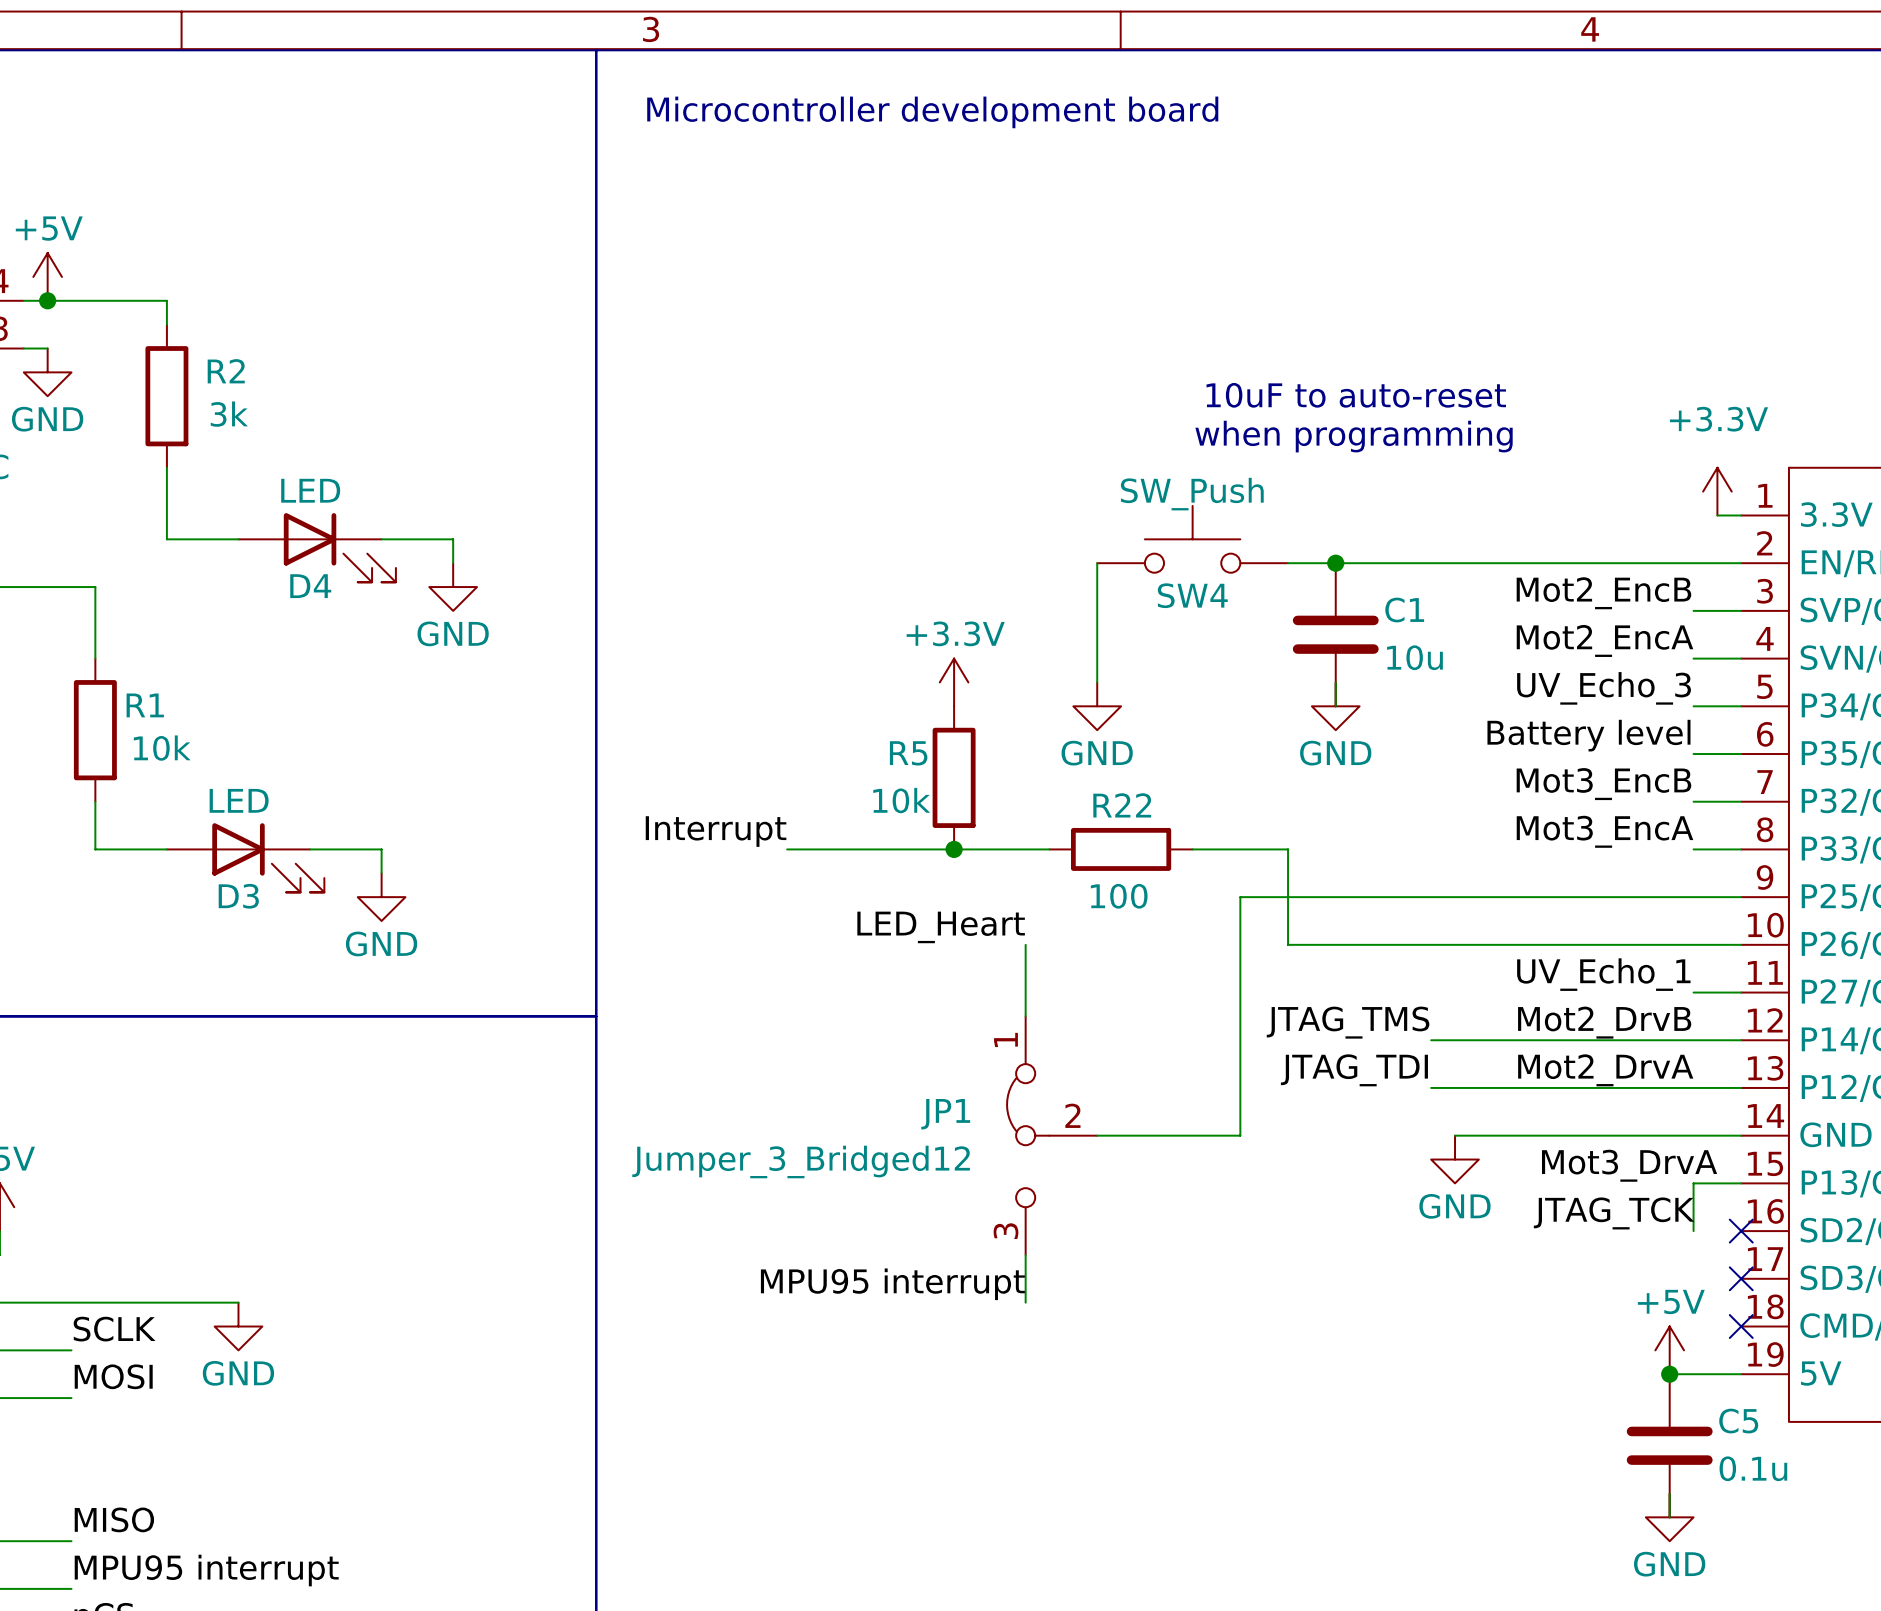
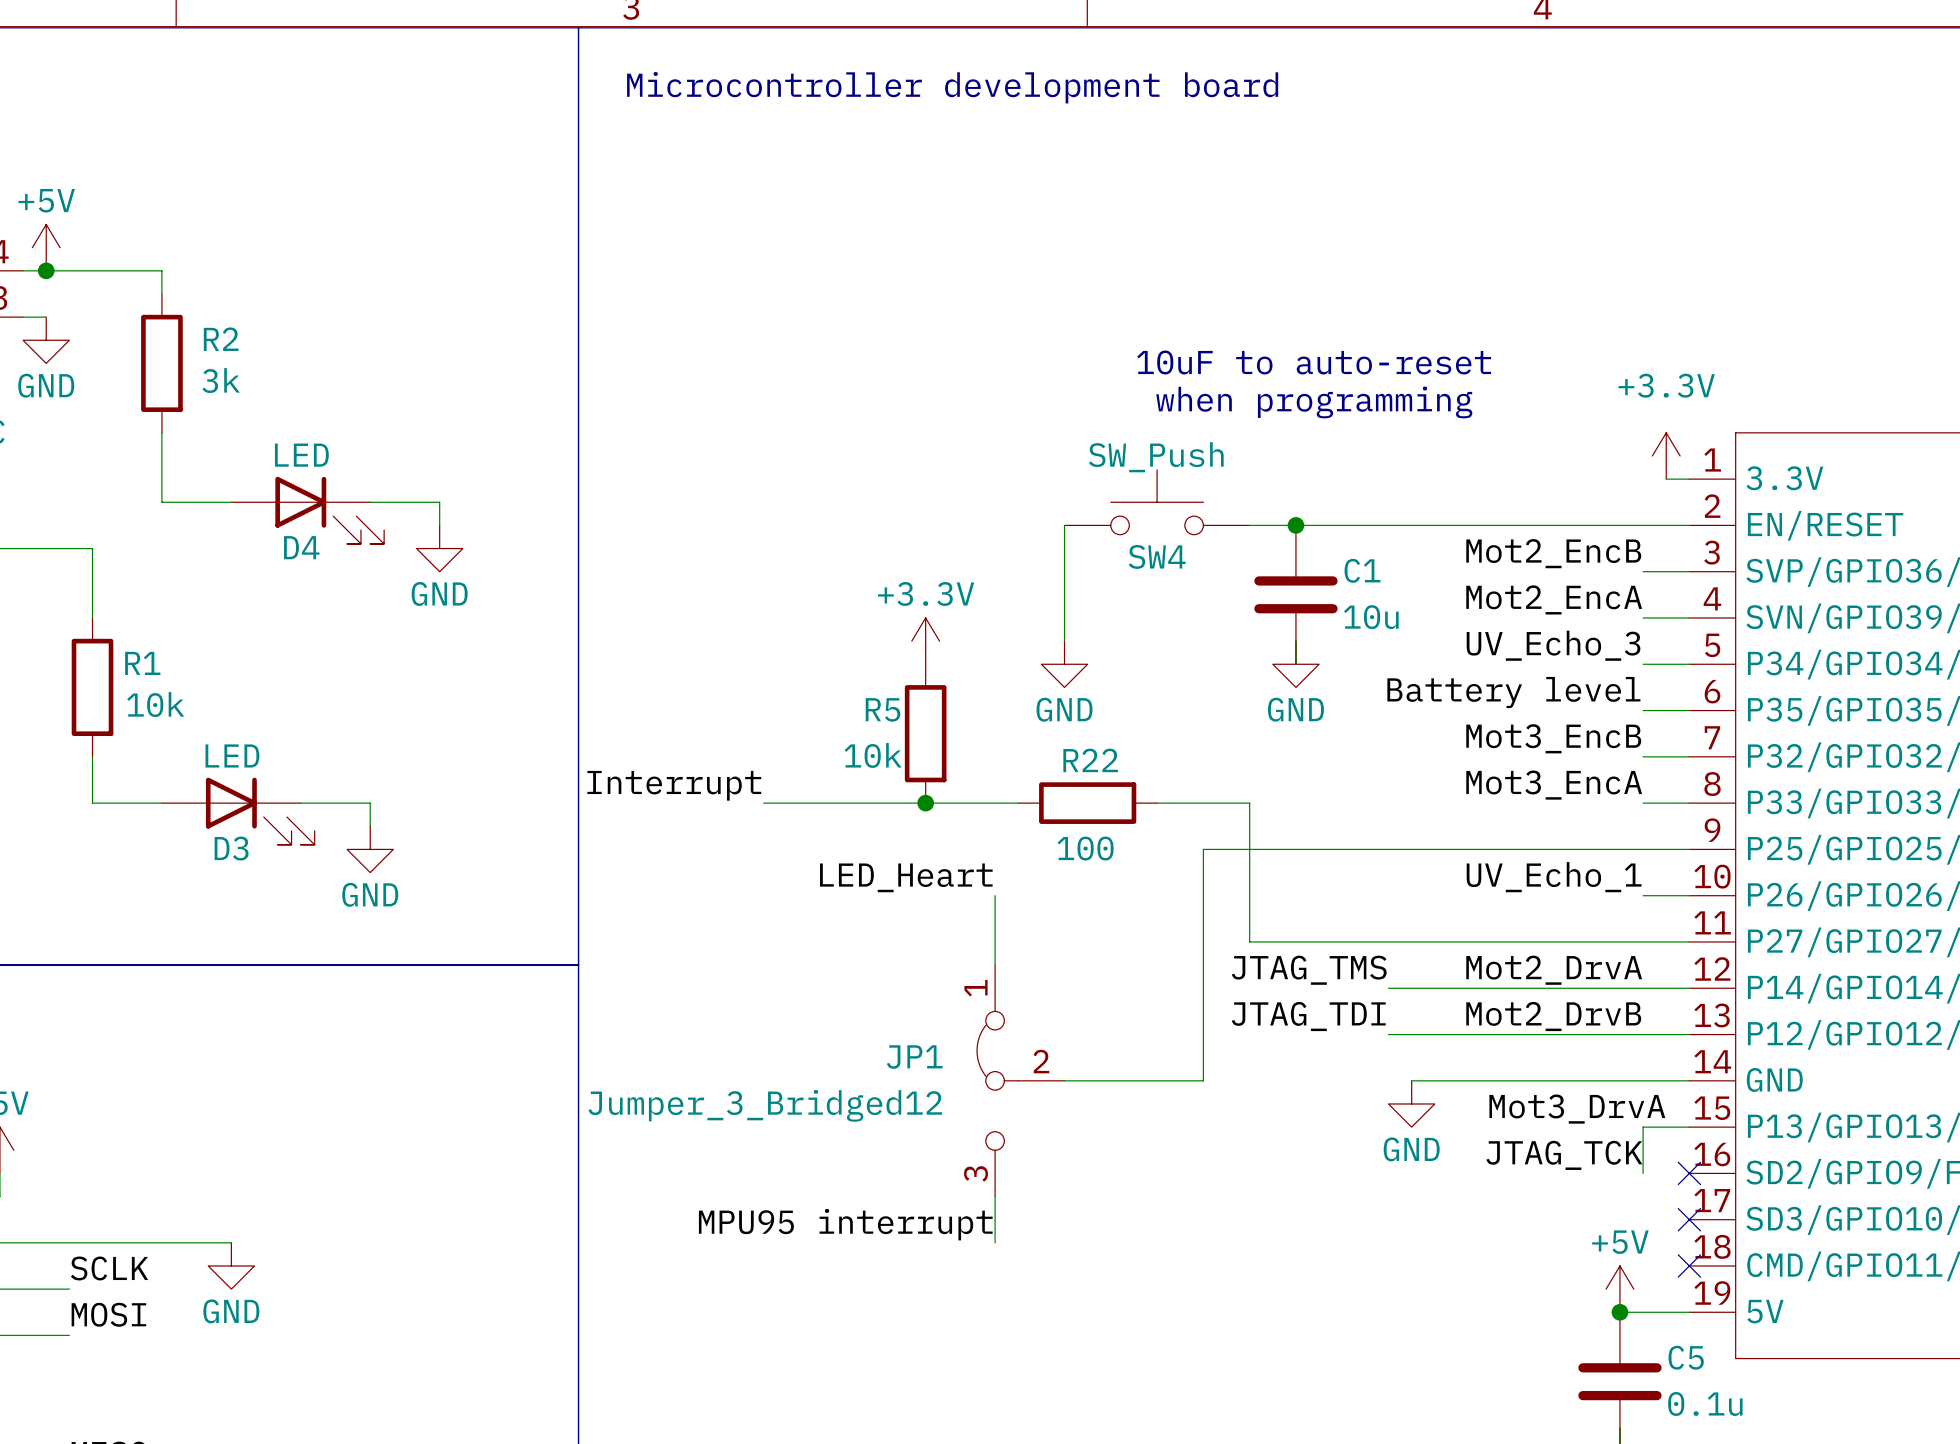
wire: (1288, 944) (1693, 944) -> (1249, 895) (1249, 941) (1643, 941)
label position: UV_Echo_1 (1603, 974) -> UV_Echo_1 (1554, 877)
label: Mot2_DrvB (1604, 1022) -> Mot2_DrvA (1554, 970)
label: Mot2_DrvA (1605, 1070) -> Mot2_DrvB (1553, 1016)

